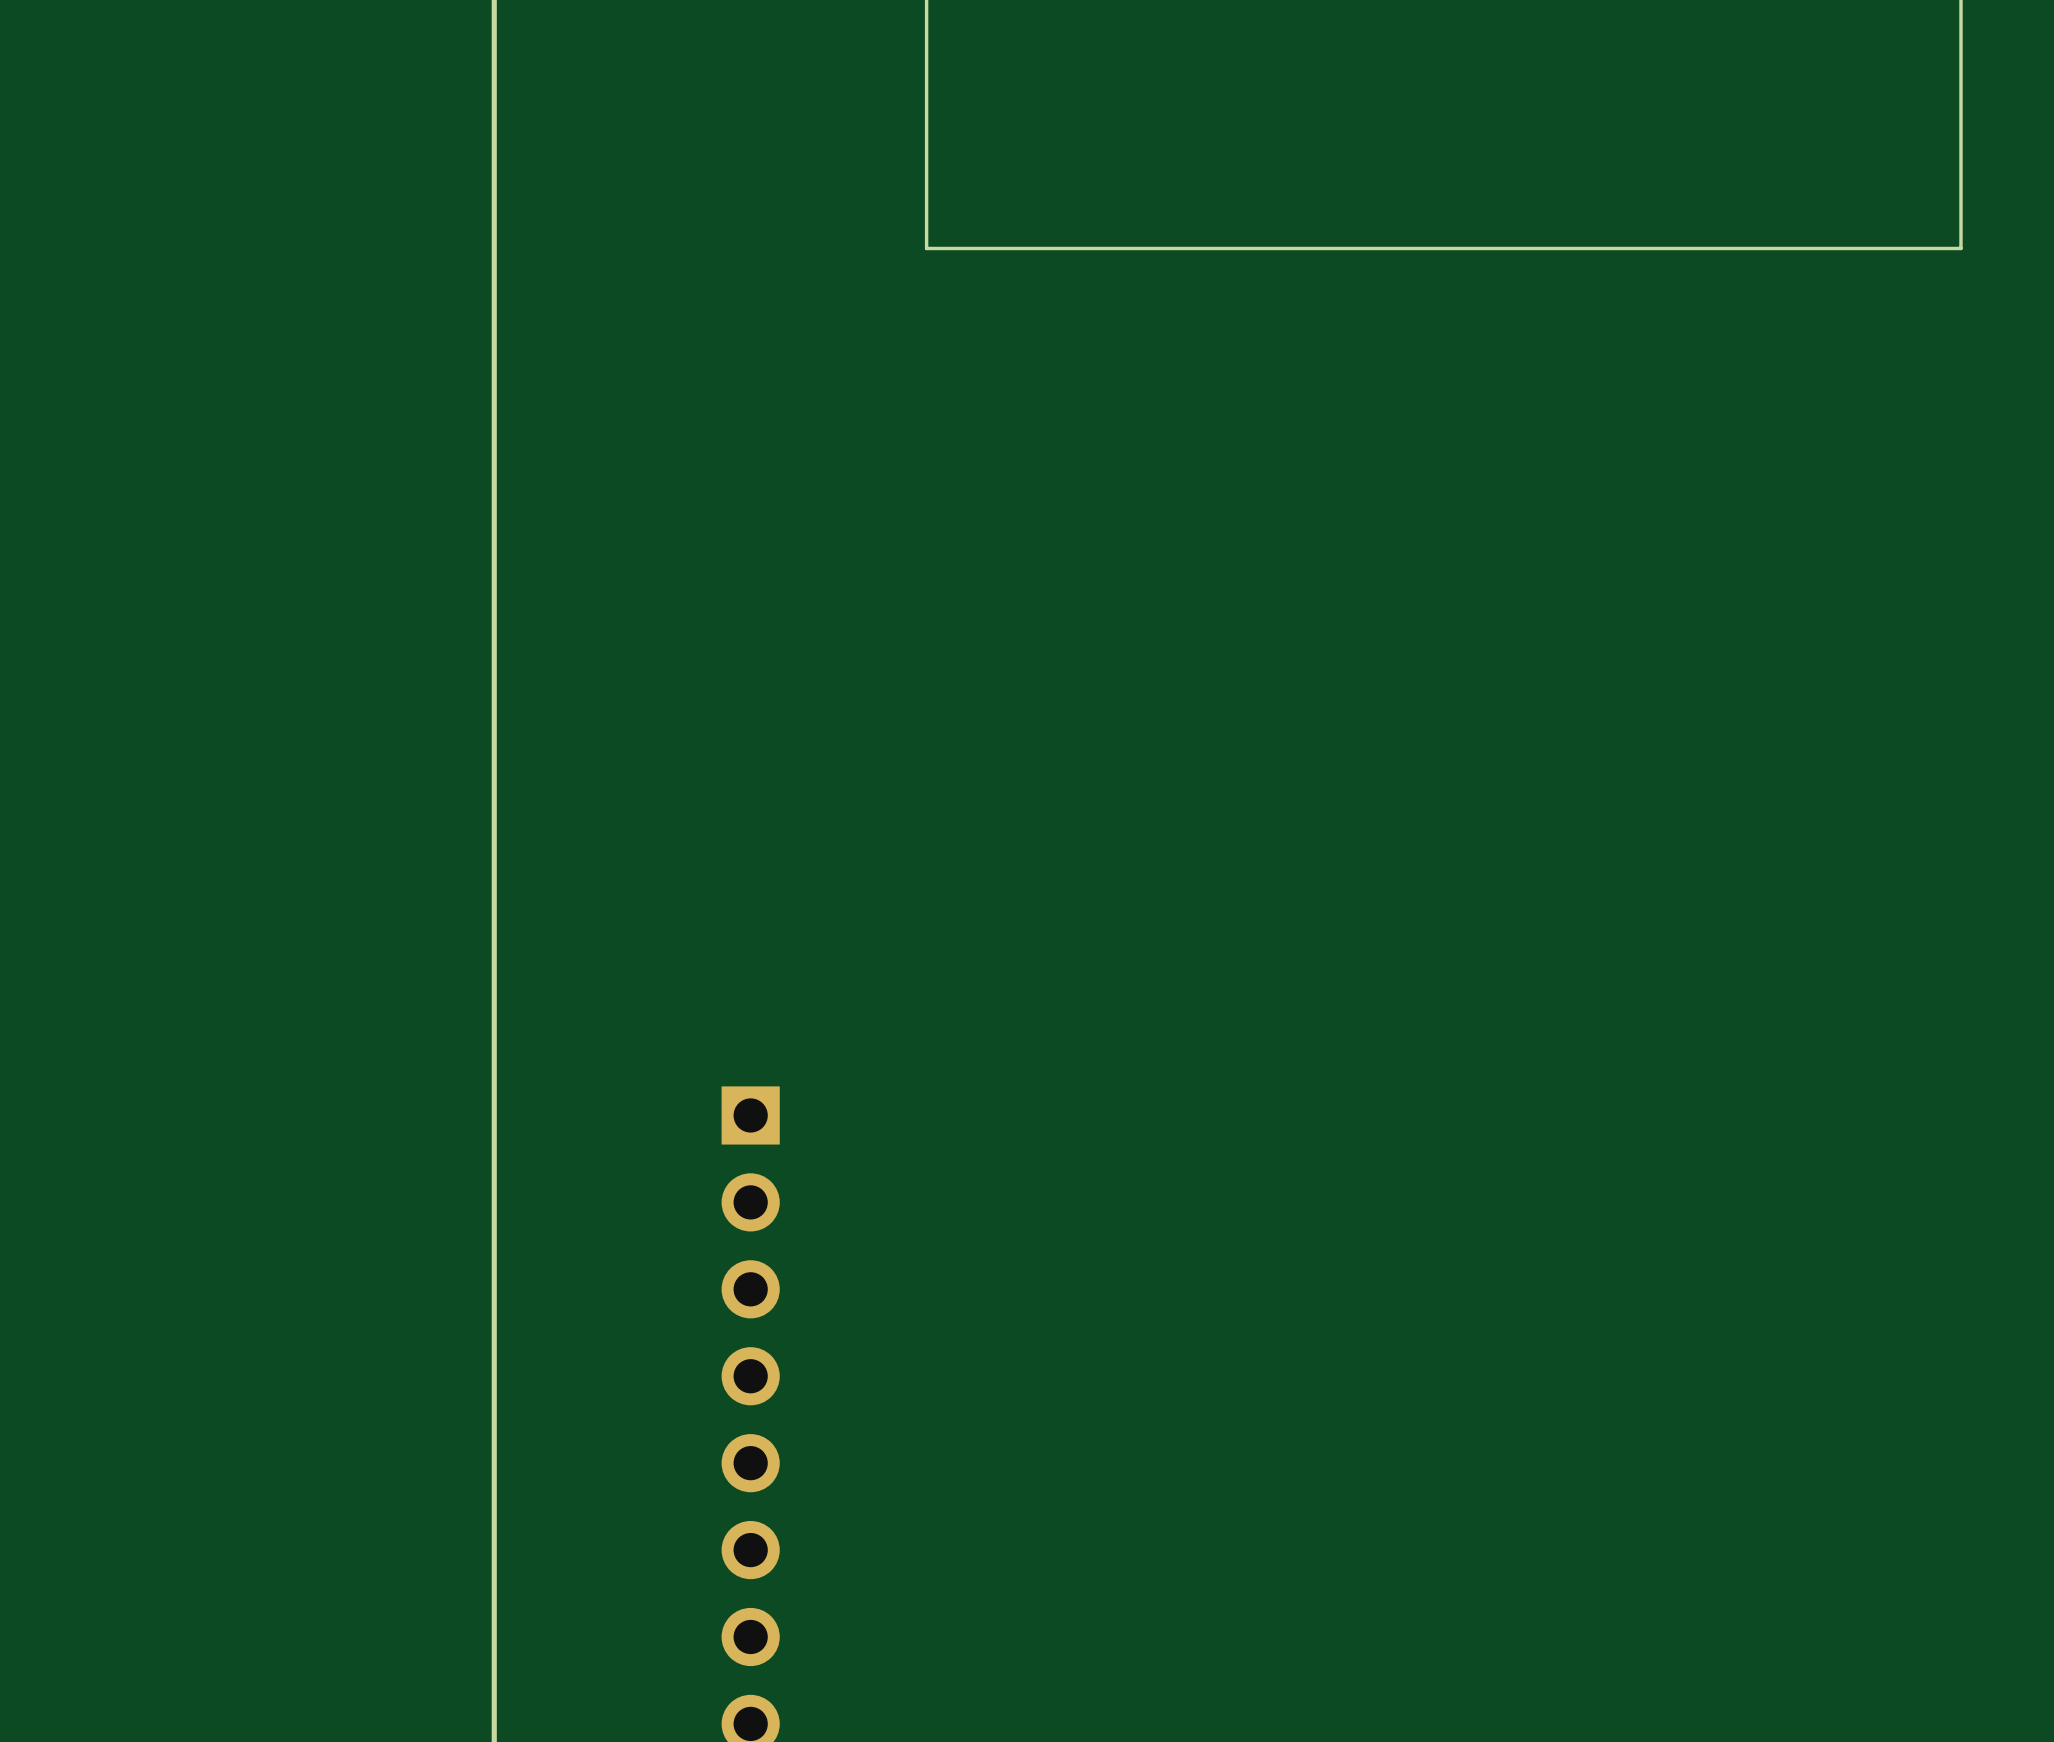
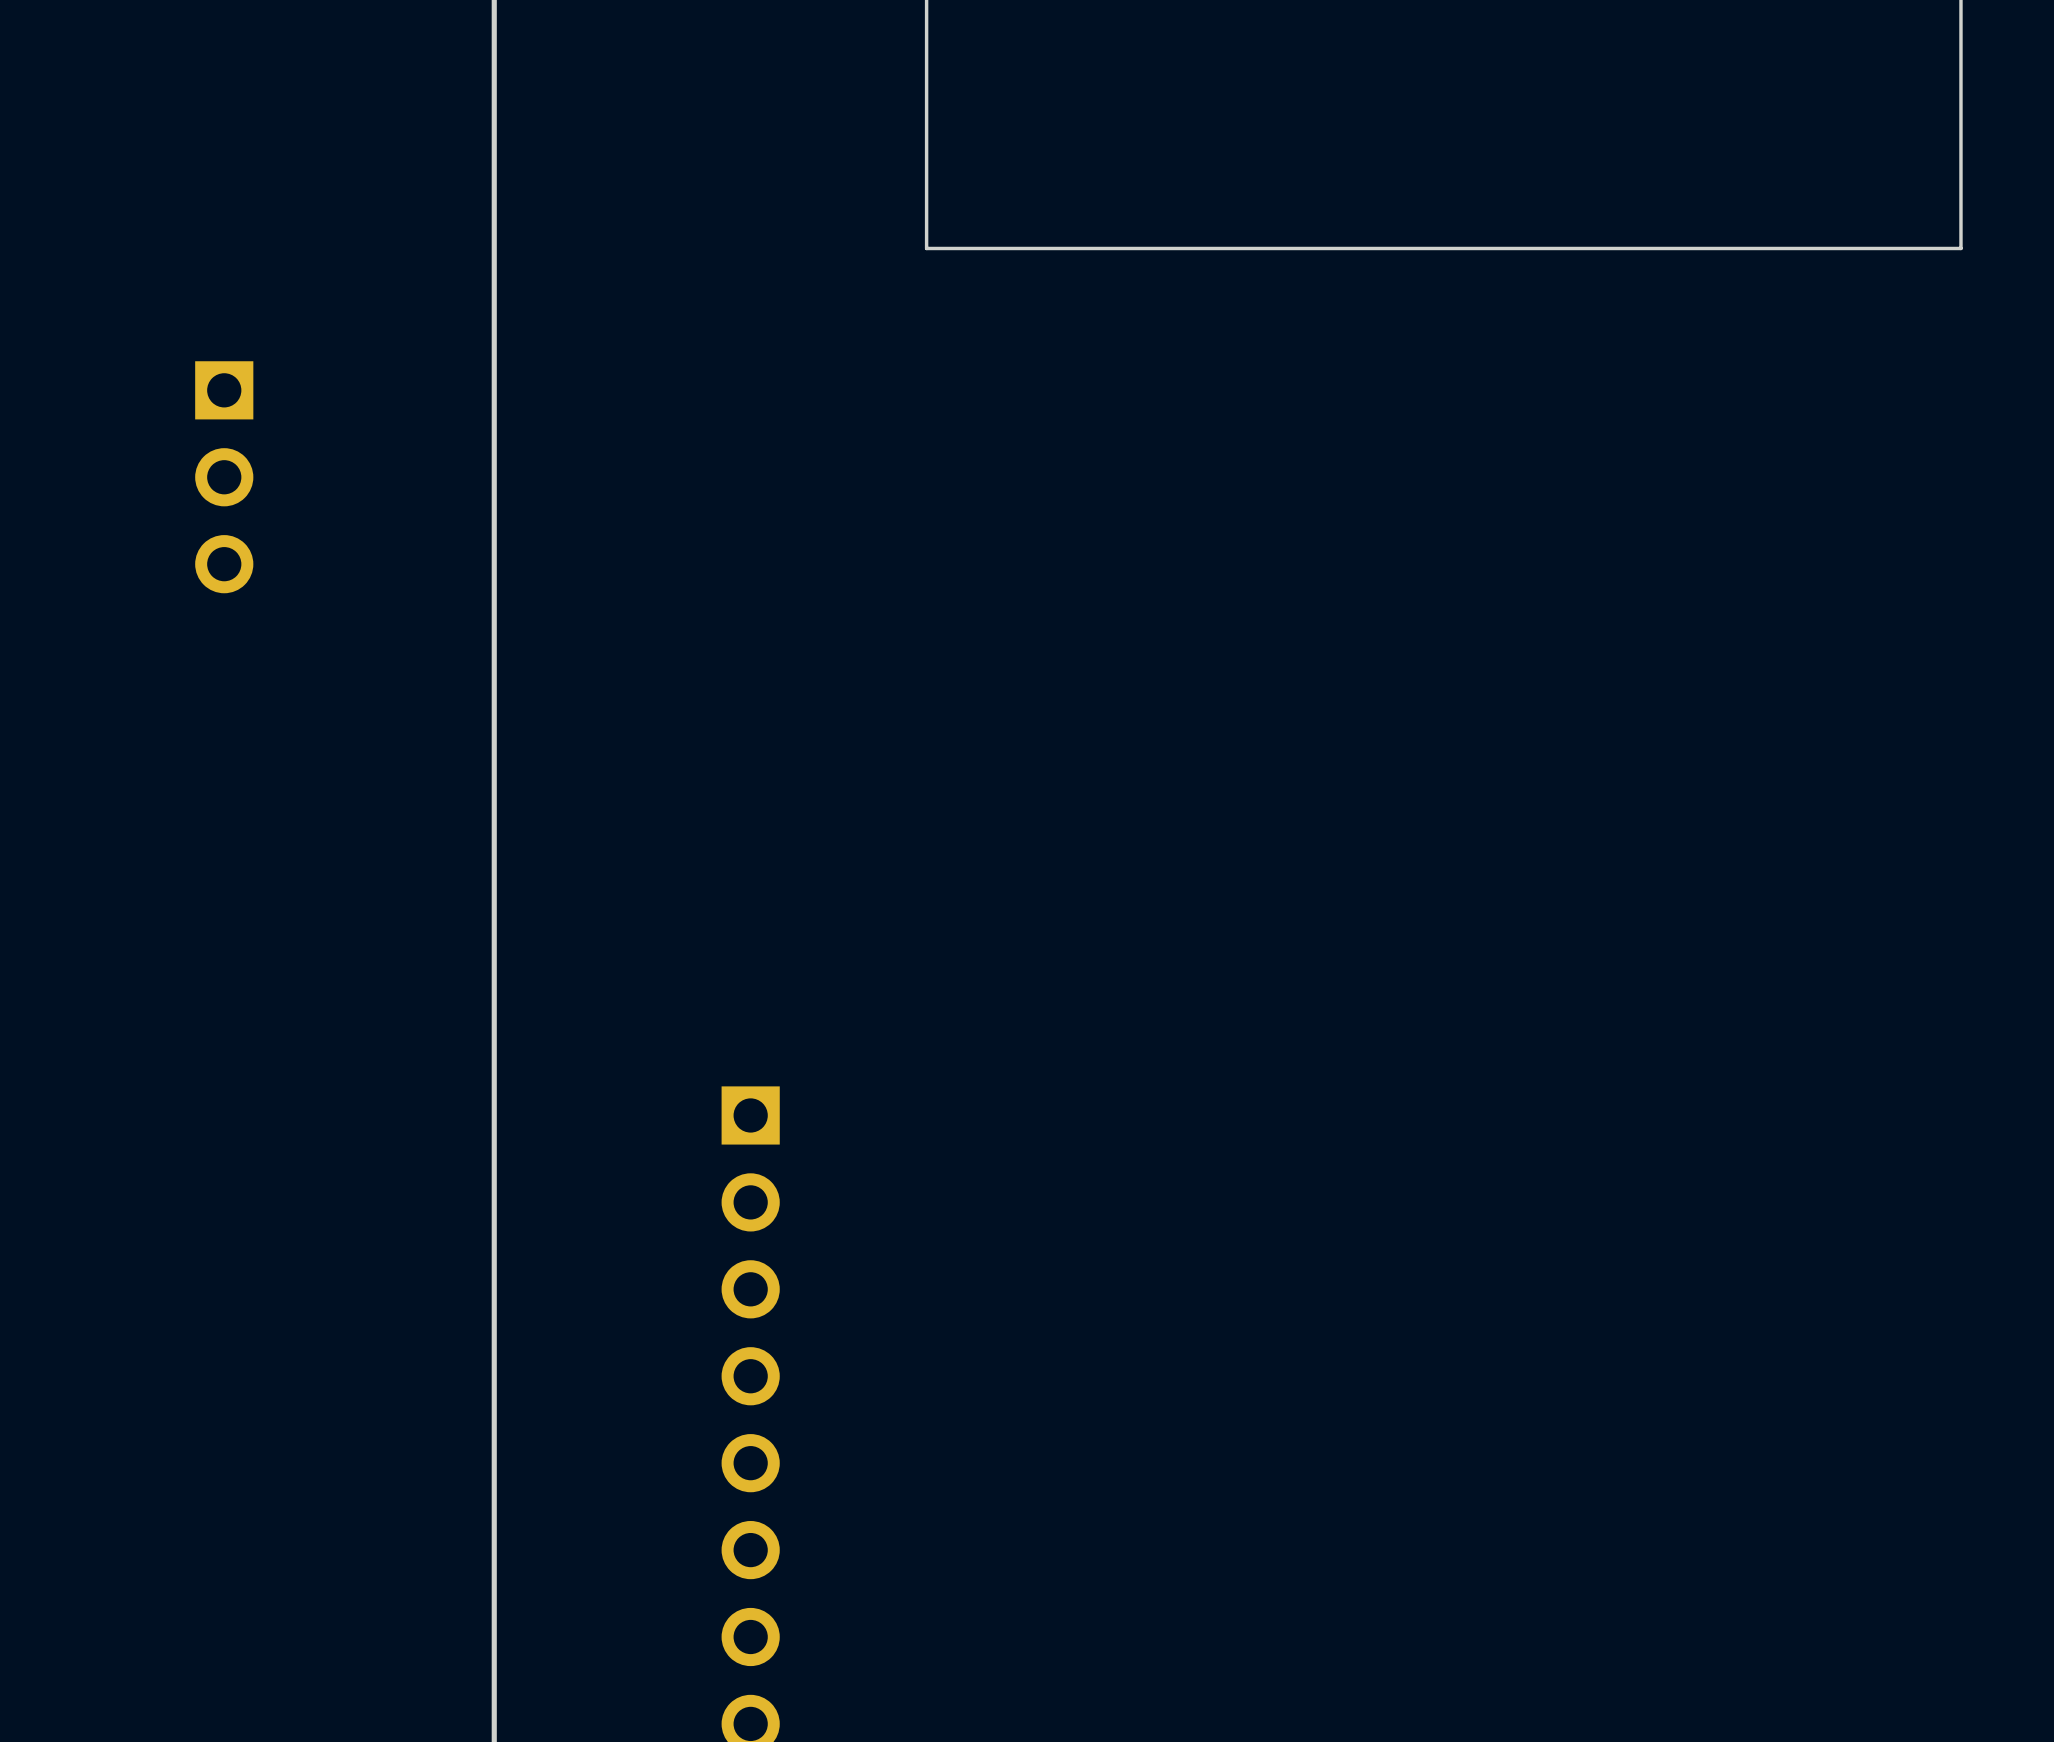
part: none -> (224, 477)

